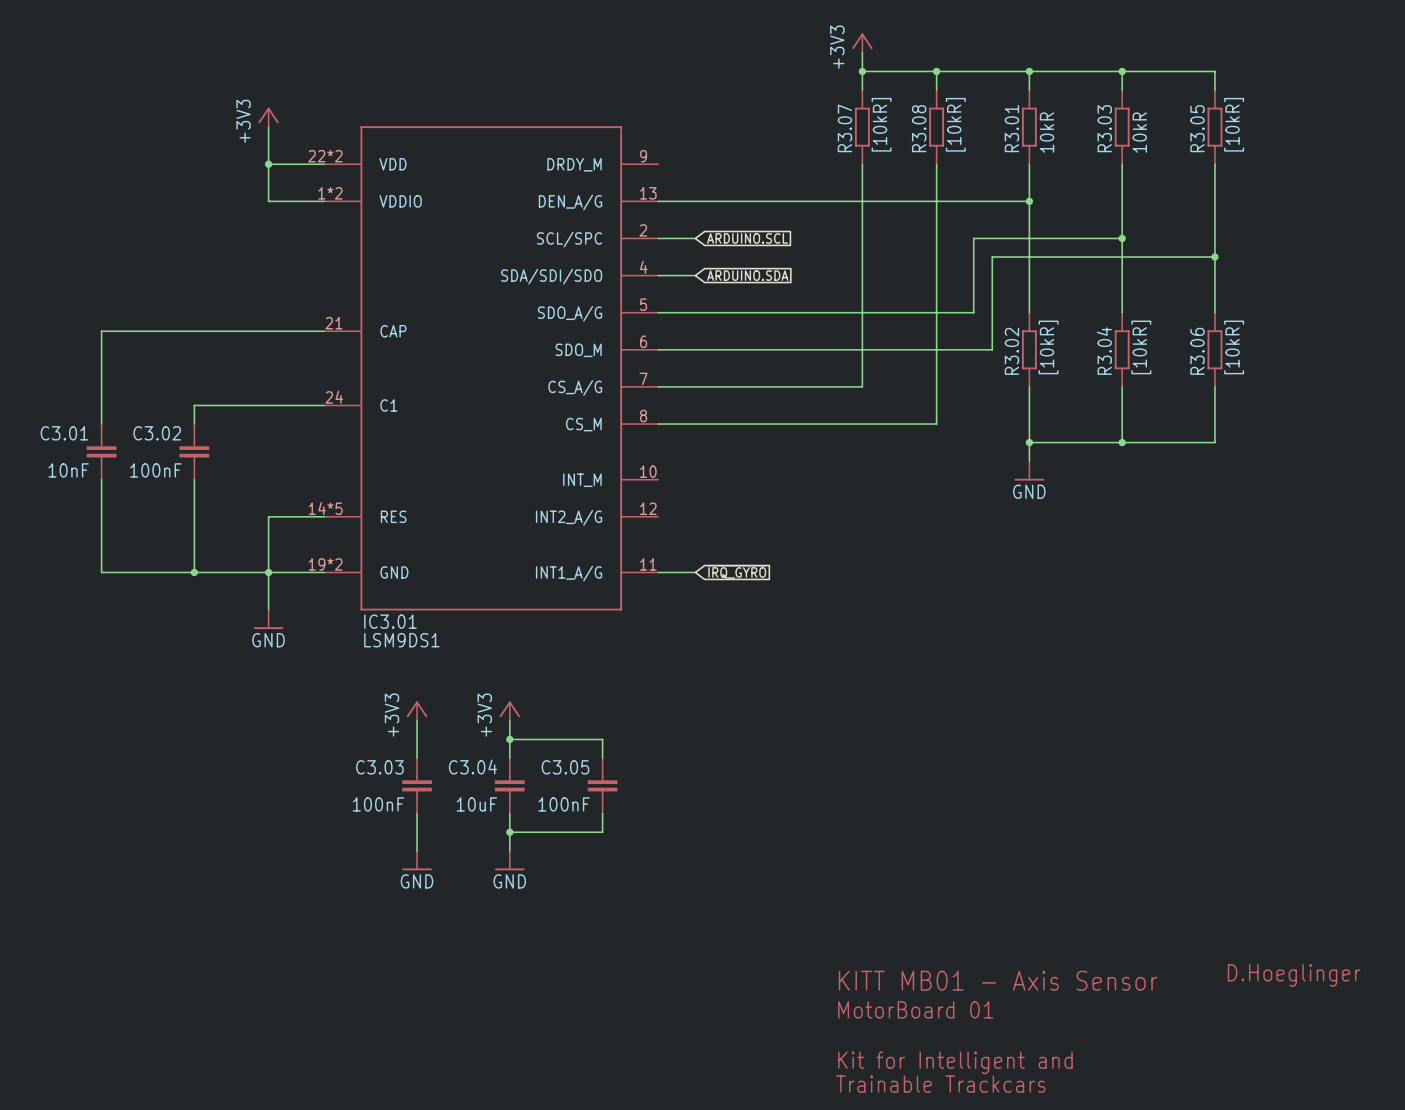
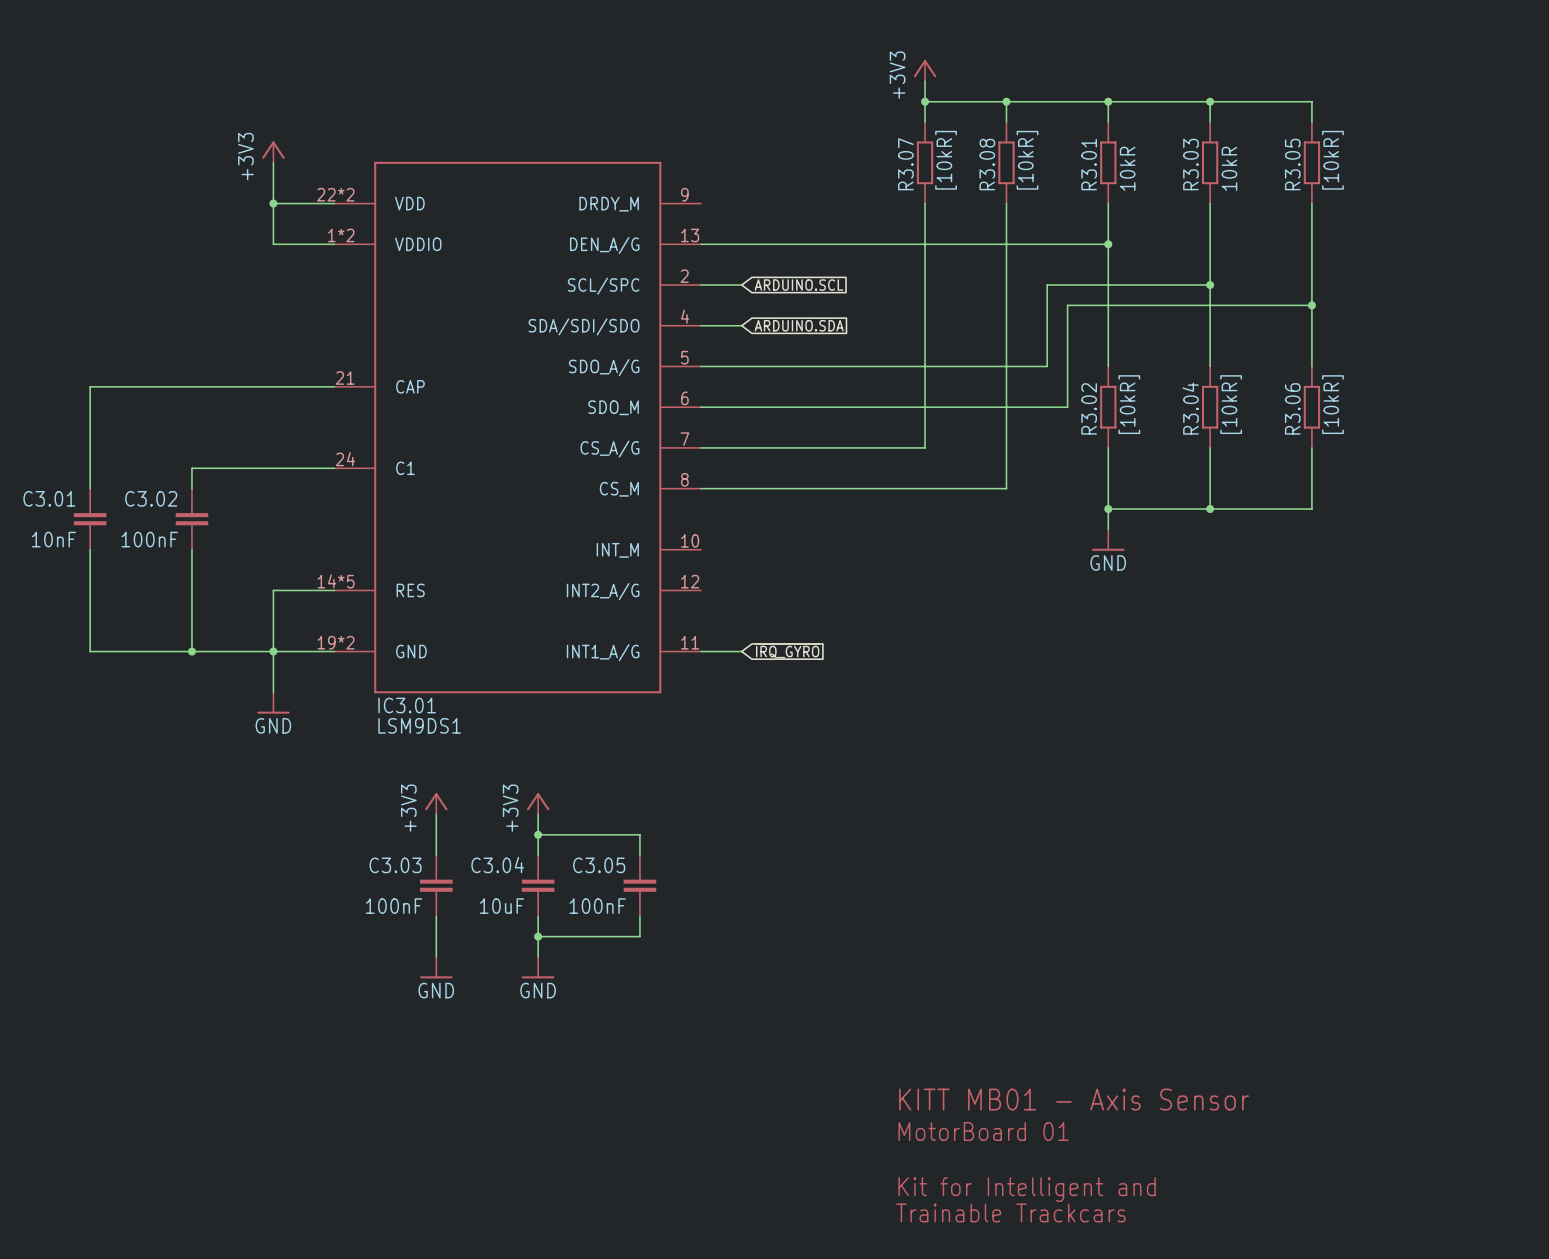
text: D.Hoeglinger (1294, 975) -> none

